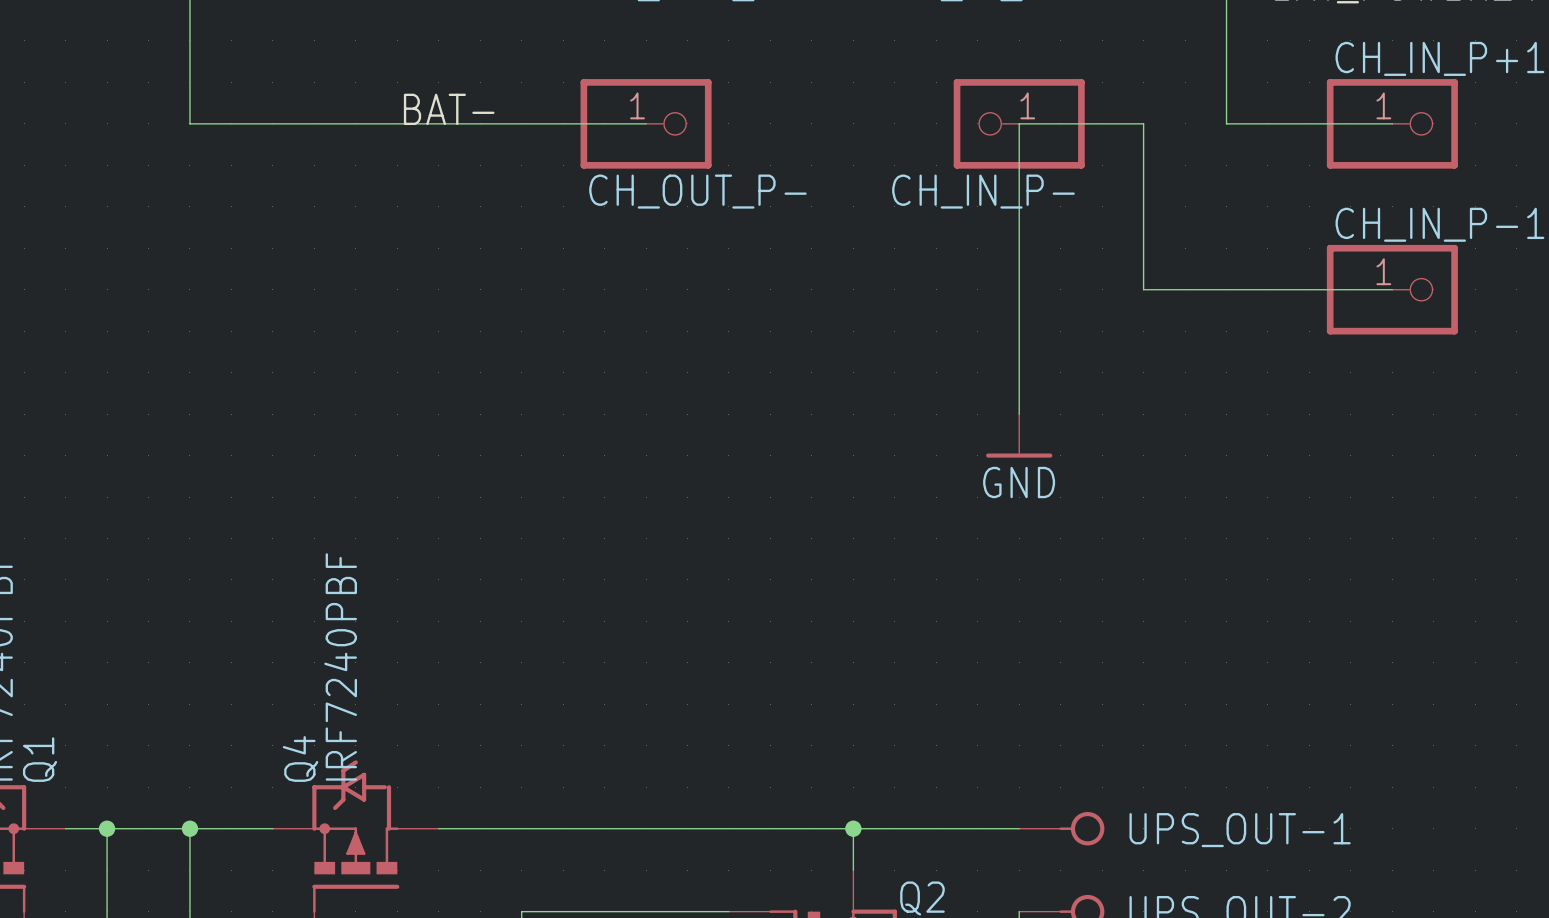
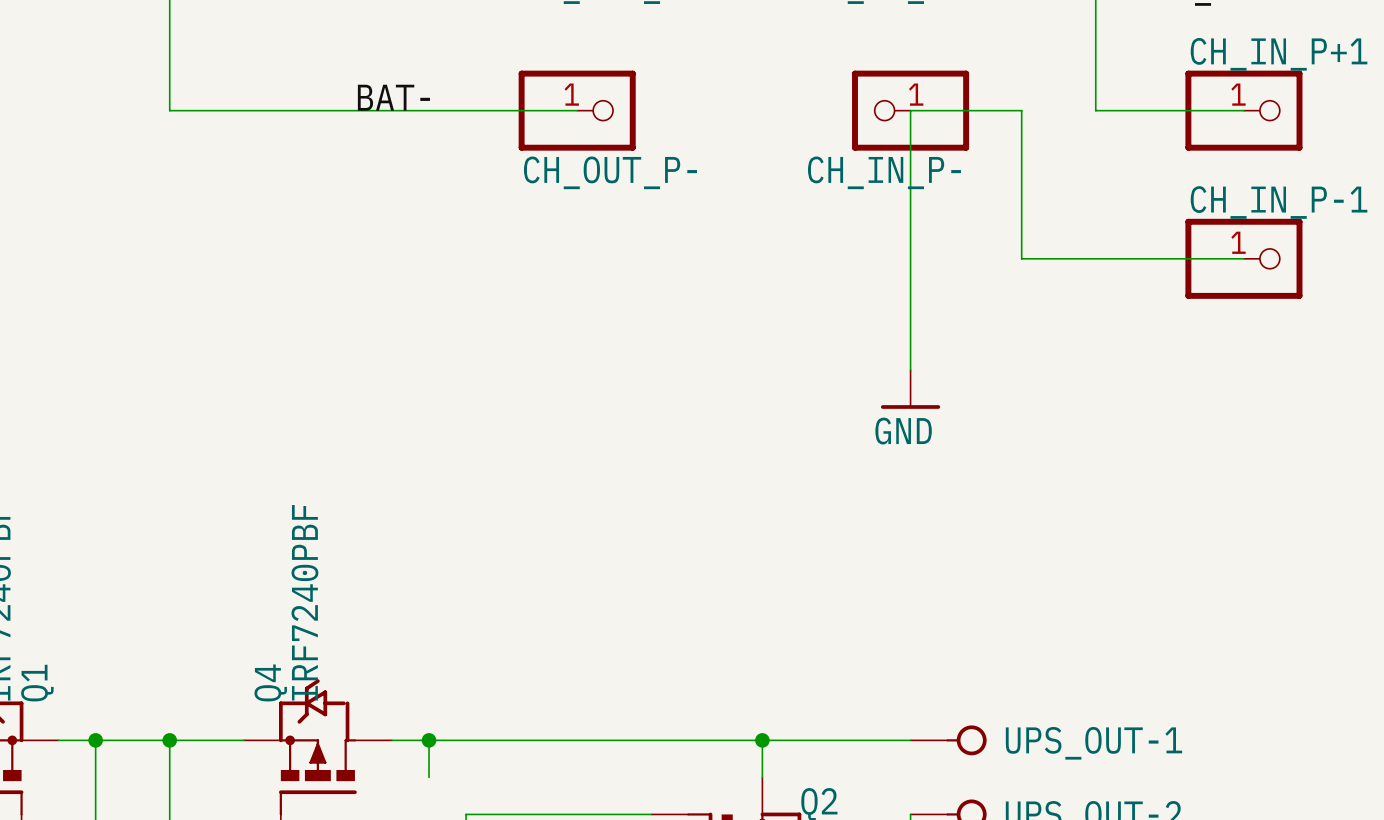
wire: none -> (429, 740) (429, 777)
junction: none -> (429, 740)

